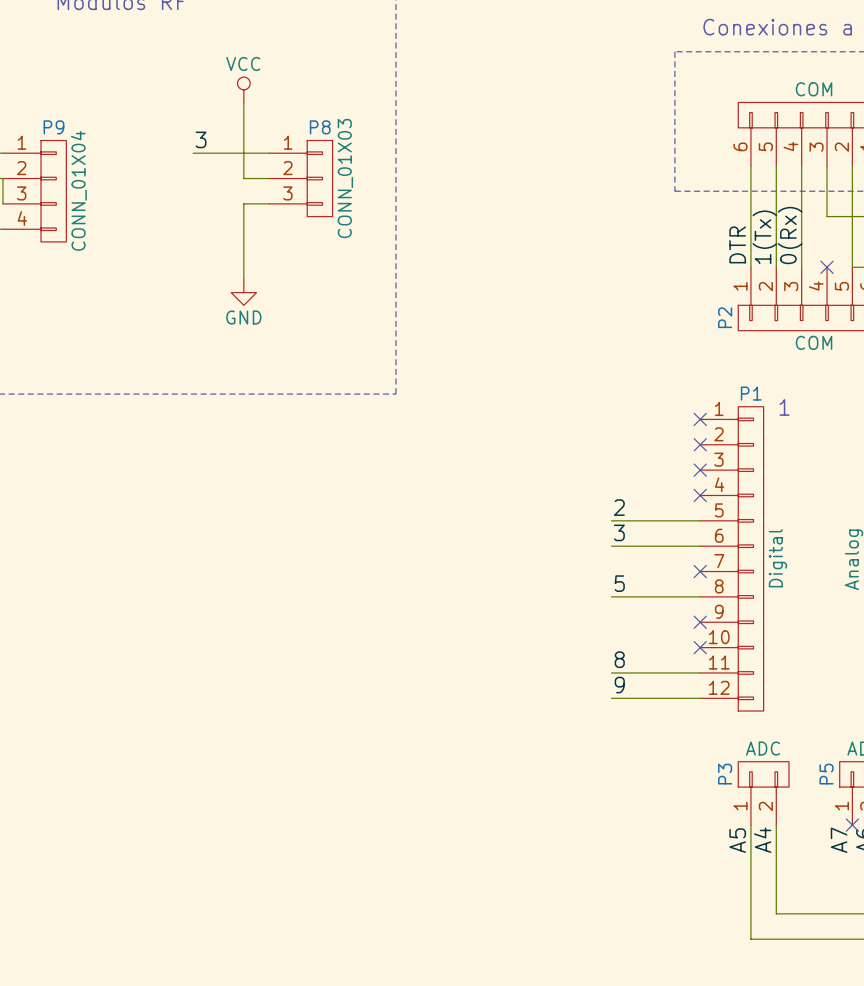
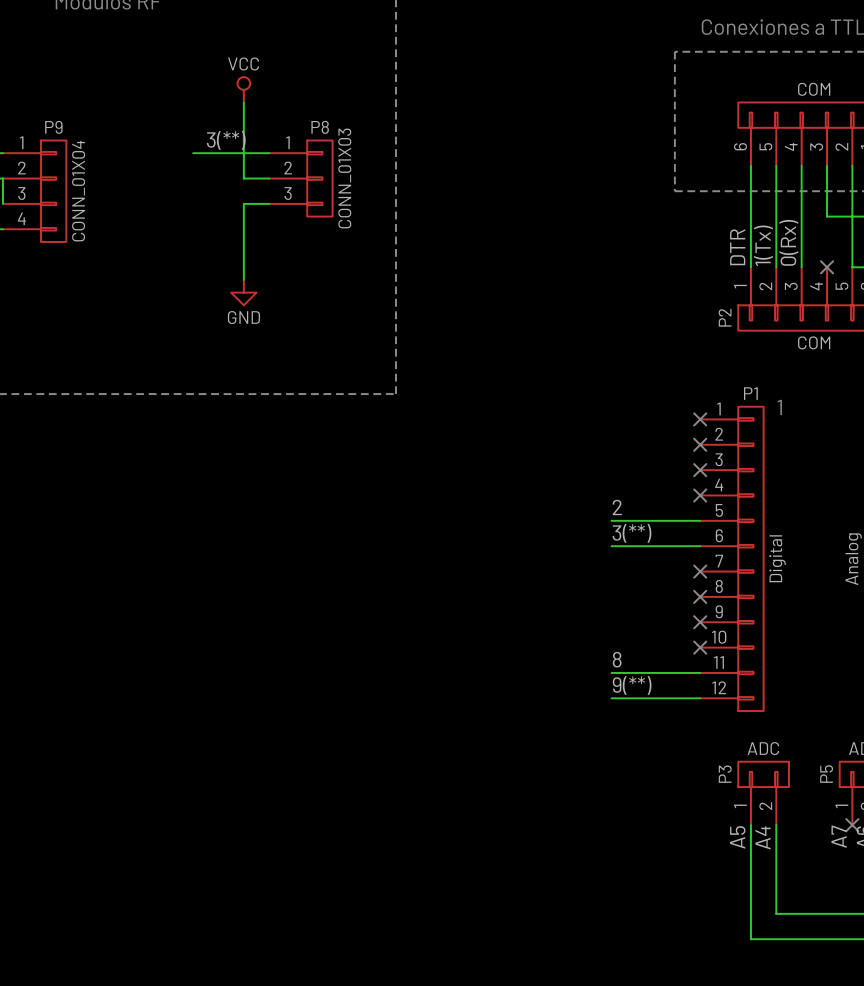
label: 3 (201, 139) -> none
label: none -> 3(**) (226, 140)
label: 3 (619, 532) -> 3(**) (631, 533)
label: 5 (619, 583) -> none
wire: (611, 596) (700, 596) -> none
no-connect mark: none -> (700, 596)
label: 9 (619, 685) -> 9(**) (632, 685)

